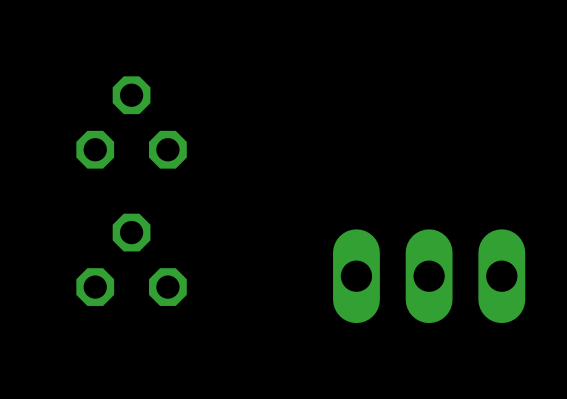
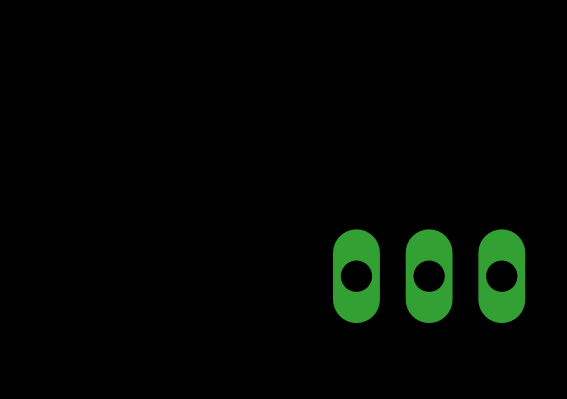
part: (131, 122) -> none
part: (131, 259) -> none

